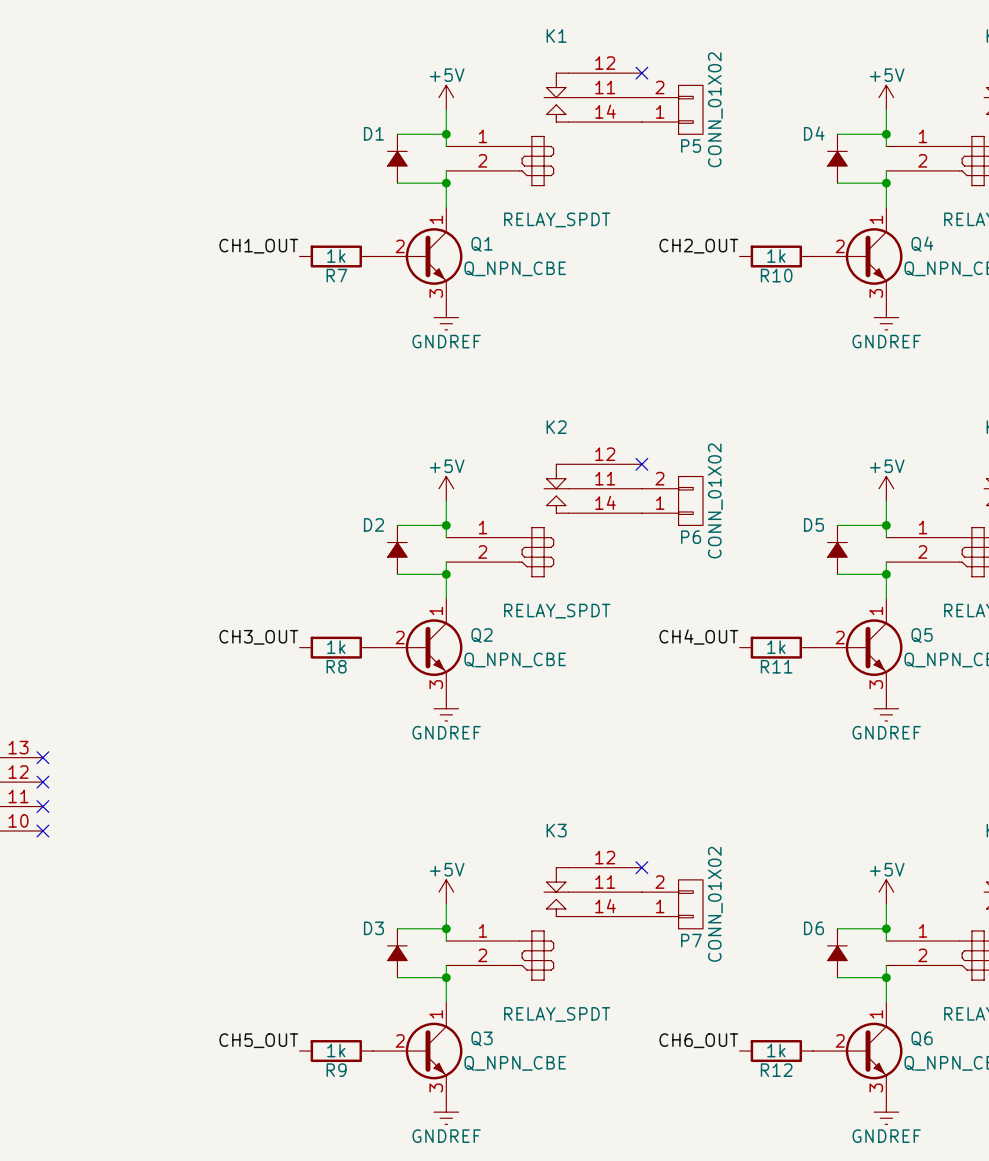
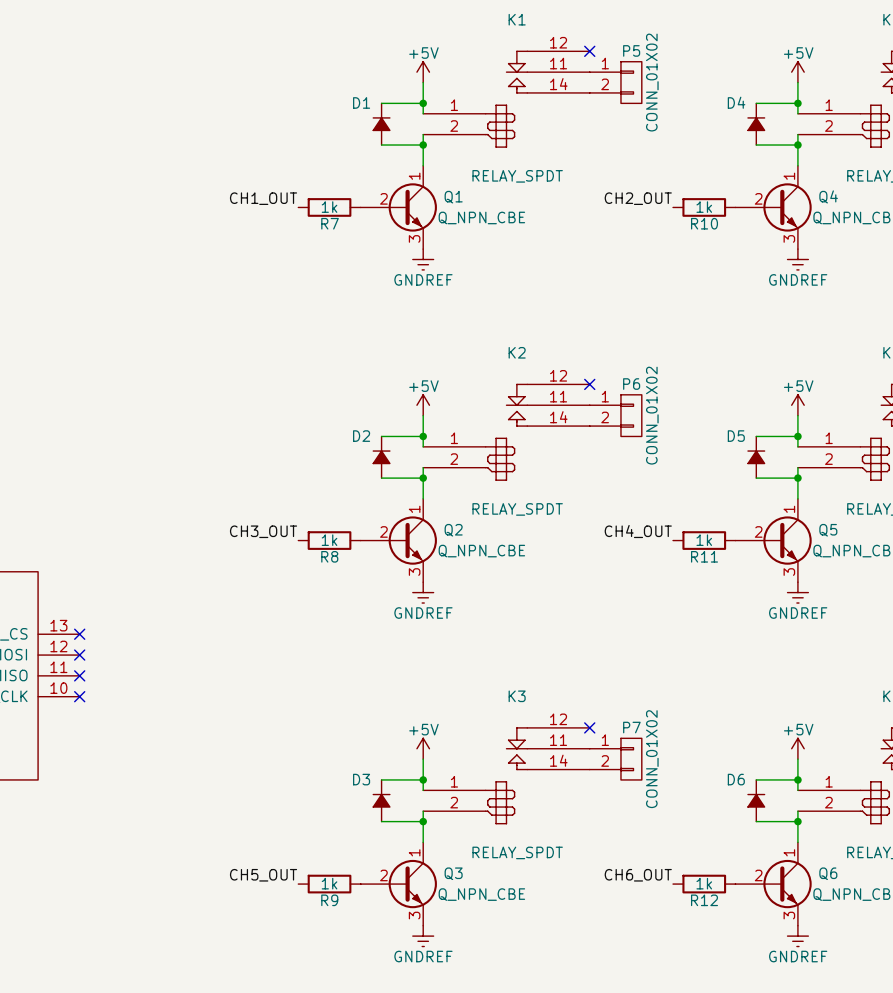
P5 flip: as is (690, 109) -> up-down (631, 82)
P6 flip: as is (690, 500) -> up-down (631, 415)
P7 flip: as is (690, 904) -> up-down (631, 759)

